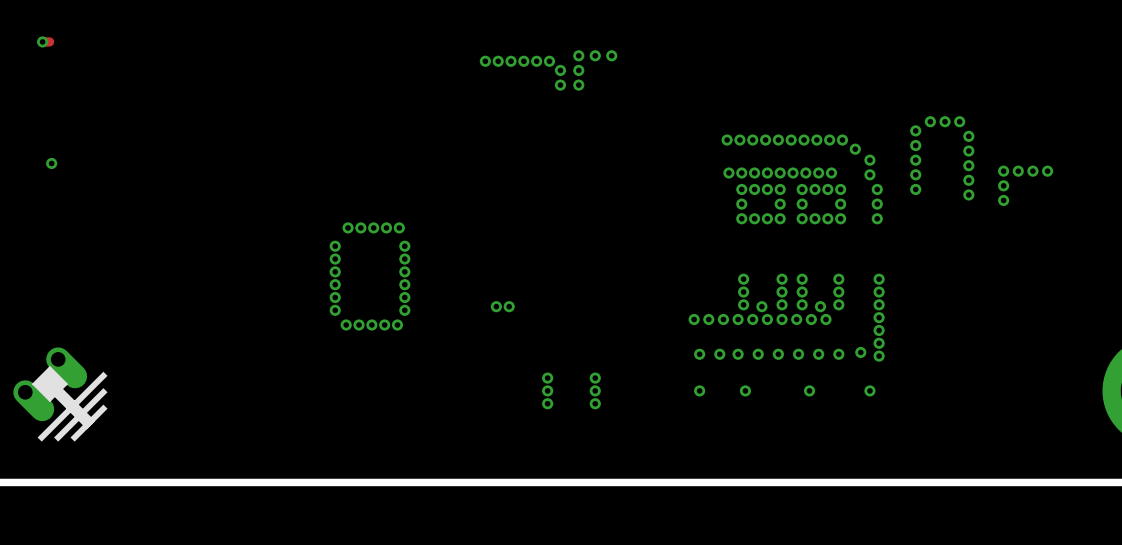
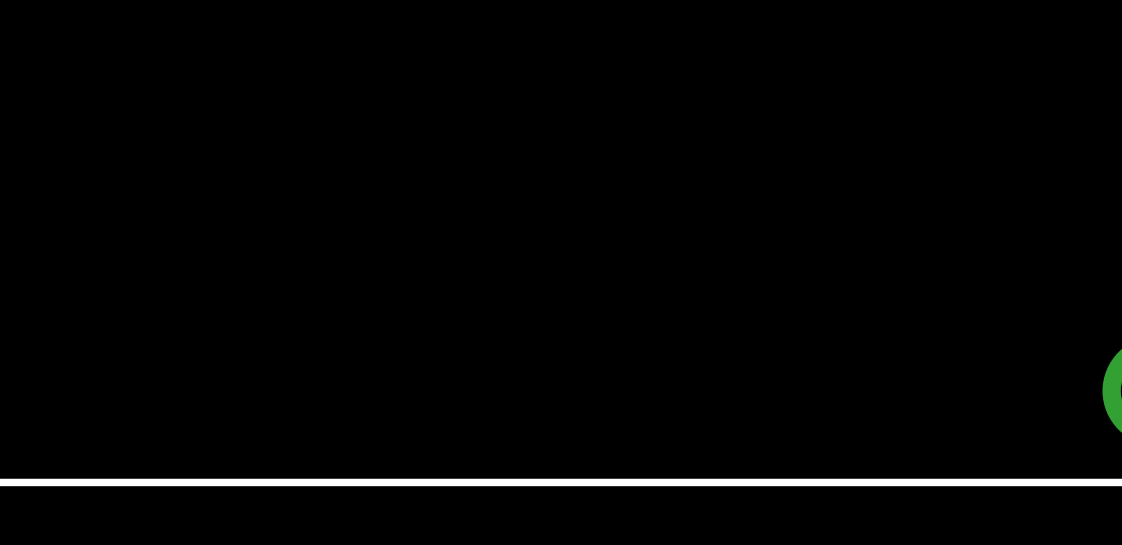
track: (42, 41) (49, 41) -> none
via: (42, 41) -> none
via: (578, 55) -> none
via: (595, 55) -> none
via: (611, 55) -> none
via: (485, 61) -> none
via: (498, 61) -> none
via: (511, 61) -> none
via: (523, 61) -> none
via: (536, 61) -> none
via: (549, 61) -> none
via: (560, 70) -> none
via: (578, 70) -> none
via: (560, 85) -> none
via: (578, 85) -> none
via: (930, 121) -> none
via: (945, 121) -> none
via: (959, 121) -> none
via: (915, 130) -> none
via: (968, 136) -> none
via: (727, 140) -> none
via: (739, 140) -> none
via: (752, 140) -> none
via: (765, 140) -> none
via: (778, 140) -> none
via: (791, 140) -> none
via: (804, 140) -> none
via: (816, 140) -> none
via: (829, 140) -> none
via: (842, 140) -> none
via: (915, 145) -> none
via: (855, 149) -> none
via: (968, 151) -> none
via: (869, 160) -> none
via: (915, 160) -> none
via: (51, 163) -> none
via: (968, 165) -> none
via: (1003, 171) -> none
via: (1018, 171) -> none
via: (1032, 171) -> none
via: (1047, 171) -> none
via: (728, 172) -> none
via: (741, 172) -> none
via: (754, 172) -> none
via: (767, 172) -> none
via: (780, 172) -> none
via: (793, 172) -> none
via: (805, 172) -> none
via: (818, 172) -> none
via: (831, 172) -> none
via: (869, 174) -> none
via: (915, 174) -> none
via: (968, 180) -> none
via: (1003, 185) -> none
via: (741, 189) -> none
via: (754, 189) -> none
via: (767, 189) -> none
via: (780, 189) -> none
via: (802, 189) -> none
via: (815, 189) -> none
via: (827, 189) -> none
via: (840, 189) -> none
via: (877, 189) -> none
via: (915, 189) -> none
via: (968, 194) -> none
via: (1003, 200) -> none
via: (741, 204) -> none
via: (780, 204) -> none
via: (802, 204) -> none
via: (840, 204) -> none
via: (877, 204) -> none
via: (741, 218) -> none
via: (754, 218) -> none
via: (767, 218) -> none
via: (780, 218) -> none
via: (802, 218) -> none
via: (815, 218) -> none
via: (827, 218) -> none
via: (840, 218) -> none
via: (877, 218) -> none
via: (348, 227) -> none
via: (360, 227) -> none
via: (373, 227) -> none
via: (386, 227) -> none
via: (399, 227) -> none
via: (335, 246) -> none
via: (404, 246) -> none
via: (335, 259) -> none
via: (404, 259) -> none
via: (335, 271) -> none
via: (404, 271) -> none
via: (743, 279) -> none
via: (782, 279) -> none
via: (802, 279) -> none
via: (838, 279) -> none
via: (879, 279) -> none
via: (335, 284) -> none
via: (404, 284) -> none
via: (743, 292) -> none
via: (782, 292) -> none
via: (802, 292) -> none
via: (838, 292) -> none
via: (879, 292) -> none
via: (335, 297) -> none
via: (404, 297) -> none
via: (743, 304) -> none
via: (782, 304) -> none
via: (802, 304) -> none
via: (838, 304) -> none
via: (879, 304) -> none
via: (496, 306) -> none
via: (509, 306) -> none
via: (761, 306) -> none
via: (820, 306) -> none
via: (335, 310) -> none
via: (404, 310) -> none
via: (879, 317) -> none
via: (694, 319) -> none
via: (708, 319) -> none
via: (723, 319) -> none
via: (738, 319) -> none
via: (752, 319) -> none
via: (767, 319) -> none
via: (782, 319) -> none
via: (796, 319) -> none
via: (811, 319) -> none
via: (825, 319) -> none
via: (346, 324) -> none
via: (359, 324) -> none
via: (371, 324) -> none
via: (384, 324) -> none
via: (397, 324) -> none
via: (879, 330) -> none
via: (879, 343) -> none
via: (860, 352) -> none
via: (699, 354) -> none
via: (719, 354) -> none
via: (738, 354) -> none
via: (758, 354) -> none
via: (778, 354) -> none
via: (798, 354) -> none
via: (818, 354) -> none
via: (838, 354) -> none
via: (879, 356) -> none
via: (547, 378) -> none
via: (595, 378) -> none
via: (547, 390) -> none
via: (595, 390) -> none
via: (699, 390) -> none
via: (745, 390) -> none
via: (809, 390) -> none
via: (869, 390) -> none
part: (60, 394) -> none
via: (547, 403) -> none
via: (595, 403) -> none

